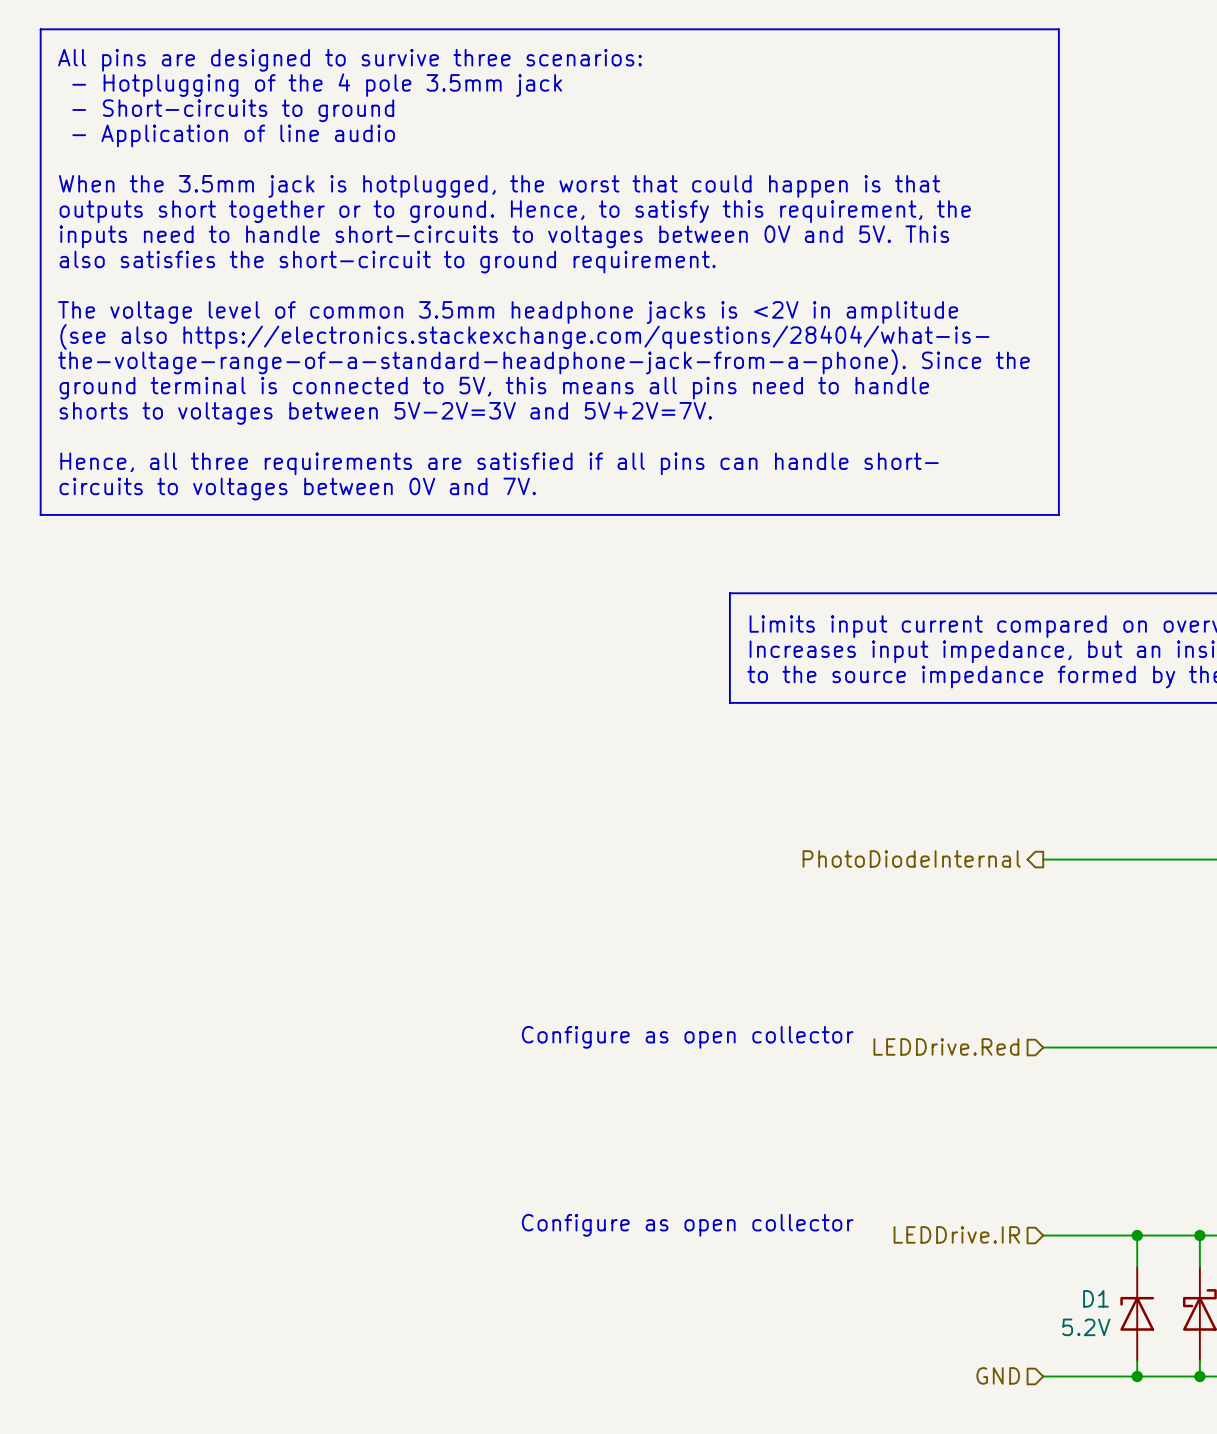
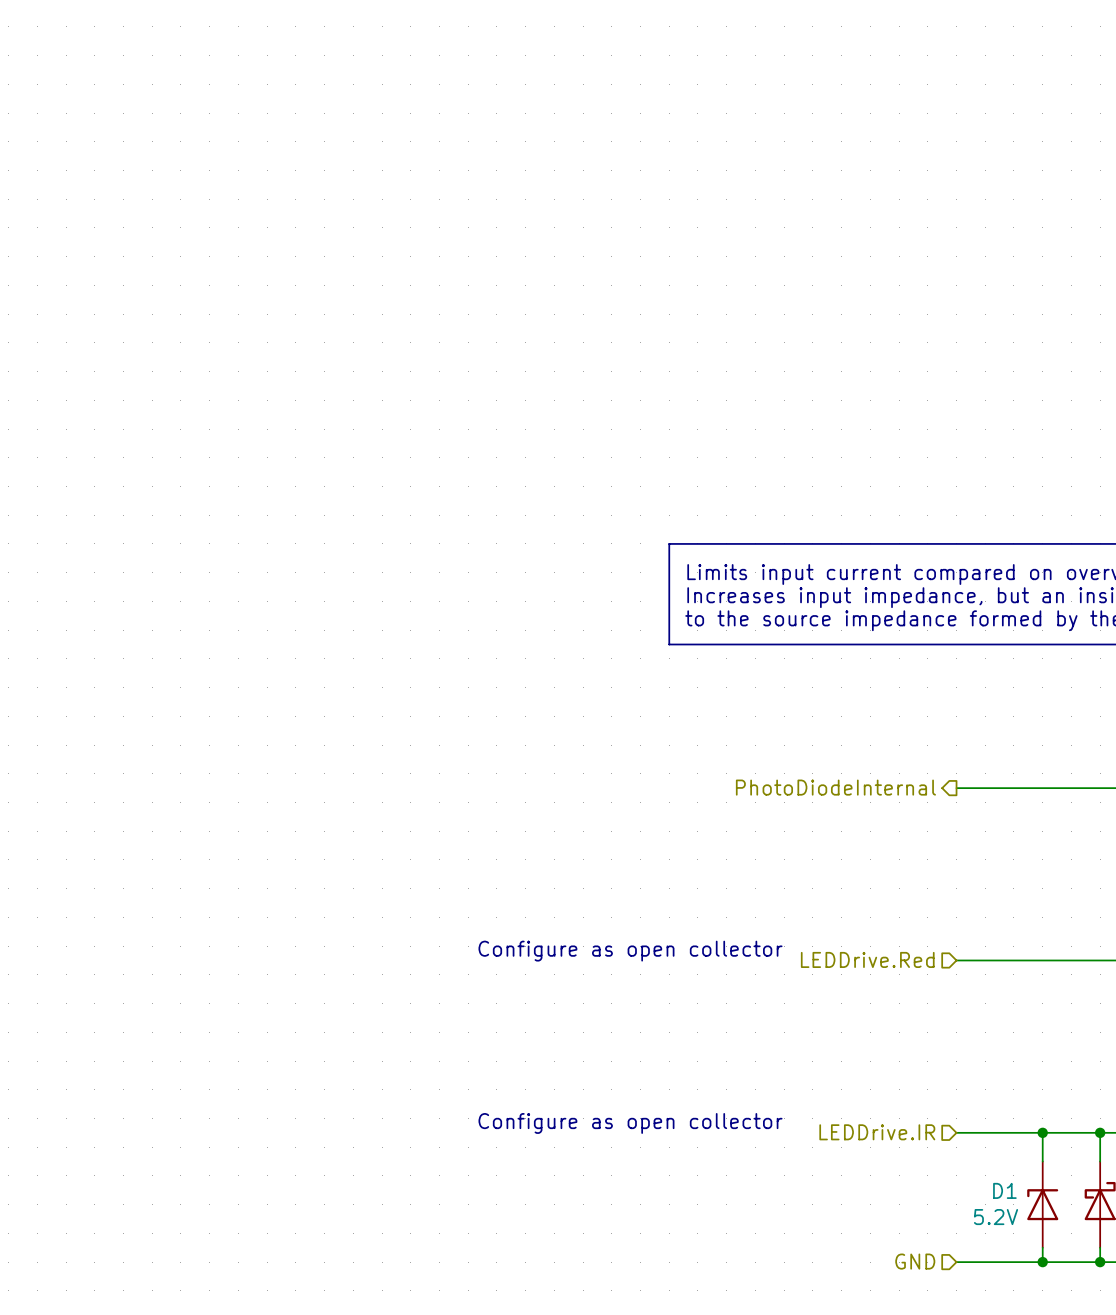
bus: (40, 29) (1058, 29) (1058, 514) (40, 514) (40, 29) -> none
text: All pins are designed to survive three scenarios: (349, 60) -> none
text: - Hotplugging of the 4 pole 3.5mm jack (317, 85) -> none
text: - Short-circuits to ground (233, 110) -> none
text: - Application of line audio (233, 135) -> none
text: When the 3.5mm jack is hotplugged, the worst that could happen is that (499, 186) -> none
text: outputs short together or to ground. Hence, to satisfy this requirement, the (515, 211) -> none
text: inputs need to handle short-circuits to voltages between 0V and 5V. This (504, 236) -> none
text: also satisfies the short-circuit to ground requirement. (387, 262) -> none
text: The voltage level of common 3.5mm headphone jacks is <2V in amplitude (508, 312) -> none
text: (see also https://electronics.stackexchange.com/questions/28404/what-is- (524, 336) -> none
text: the-voltage-range-of-a-standard-headphone-jack-from-a-phone). Since the (543, 362) -> none
text: ground terminal is connected to 5V, this means all pins need to handle (494, 388) -> none
text: shorts to voltages between 5V-2V=3V and 5V+2V=7V. (385, 413) -> none
text: Hence, all three requirements are satisfied if all pins can handle short- (499, 463) -> none
text: circuits to voltages between 0V and 7V. (297, 489) -> none

